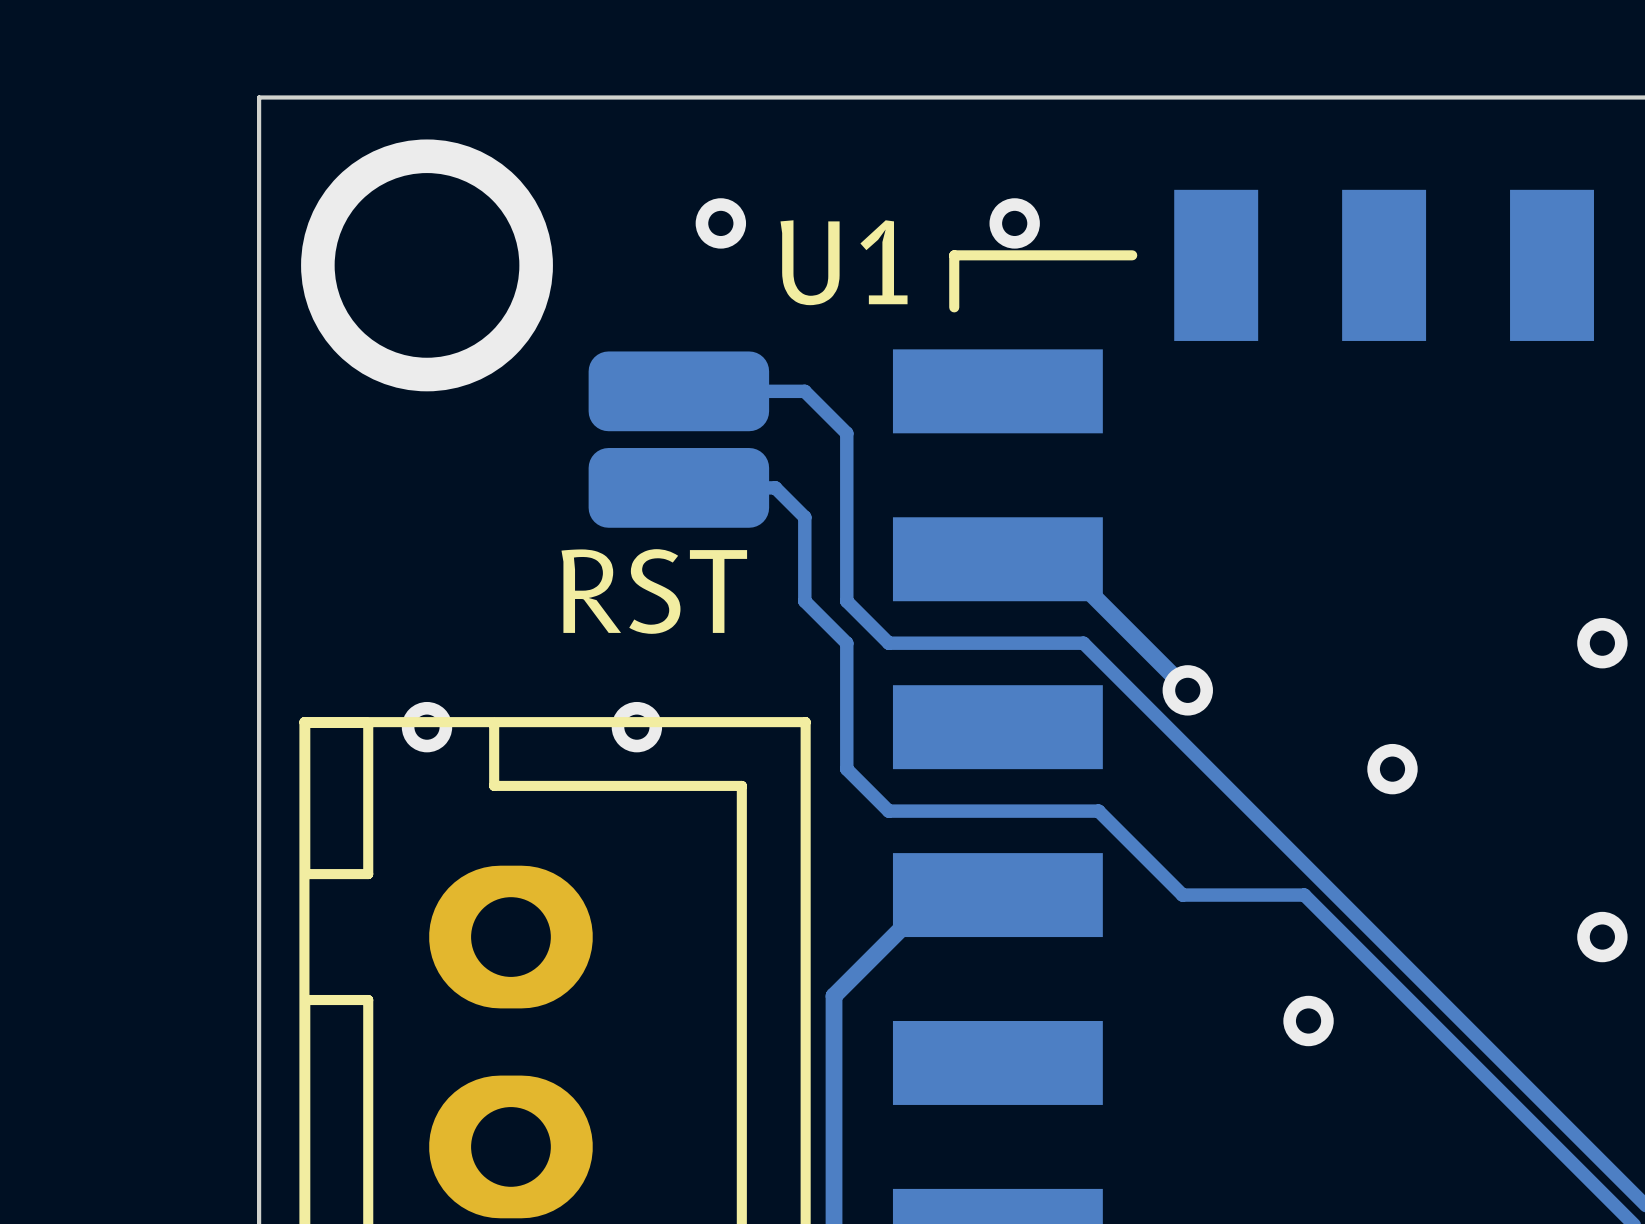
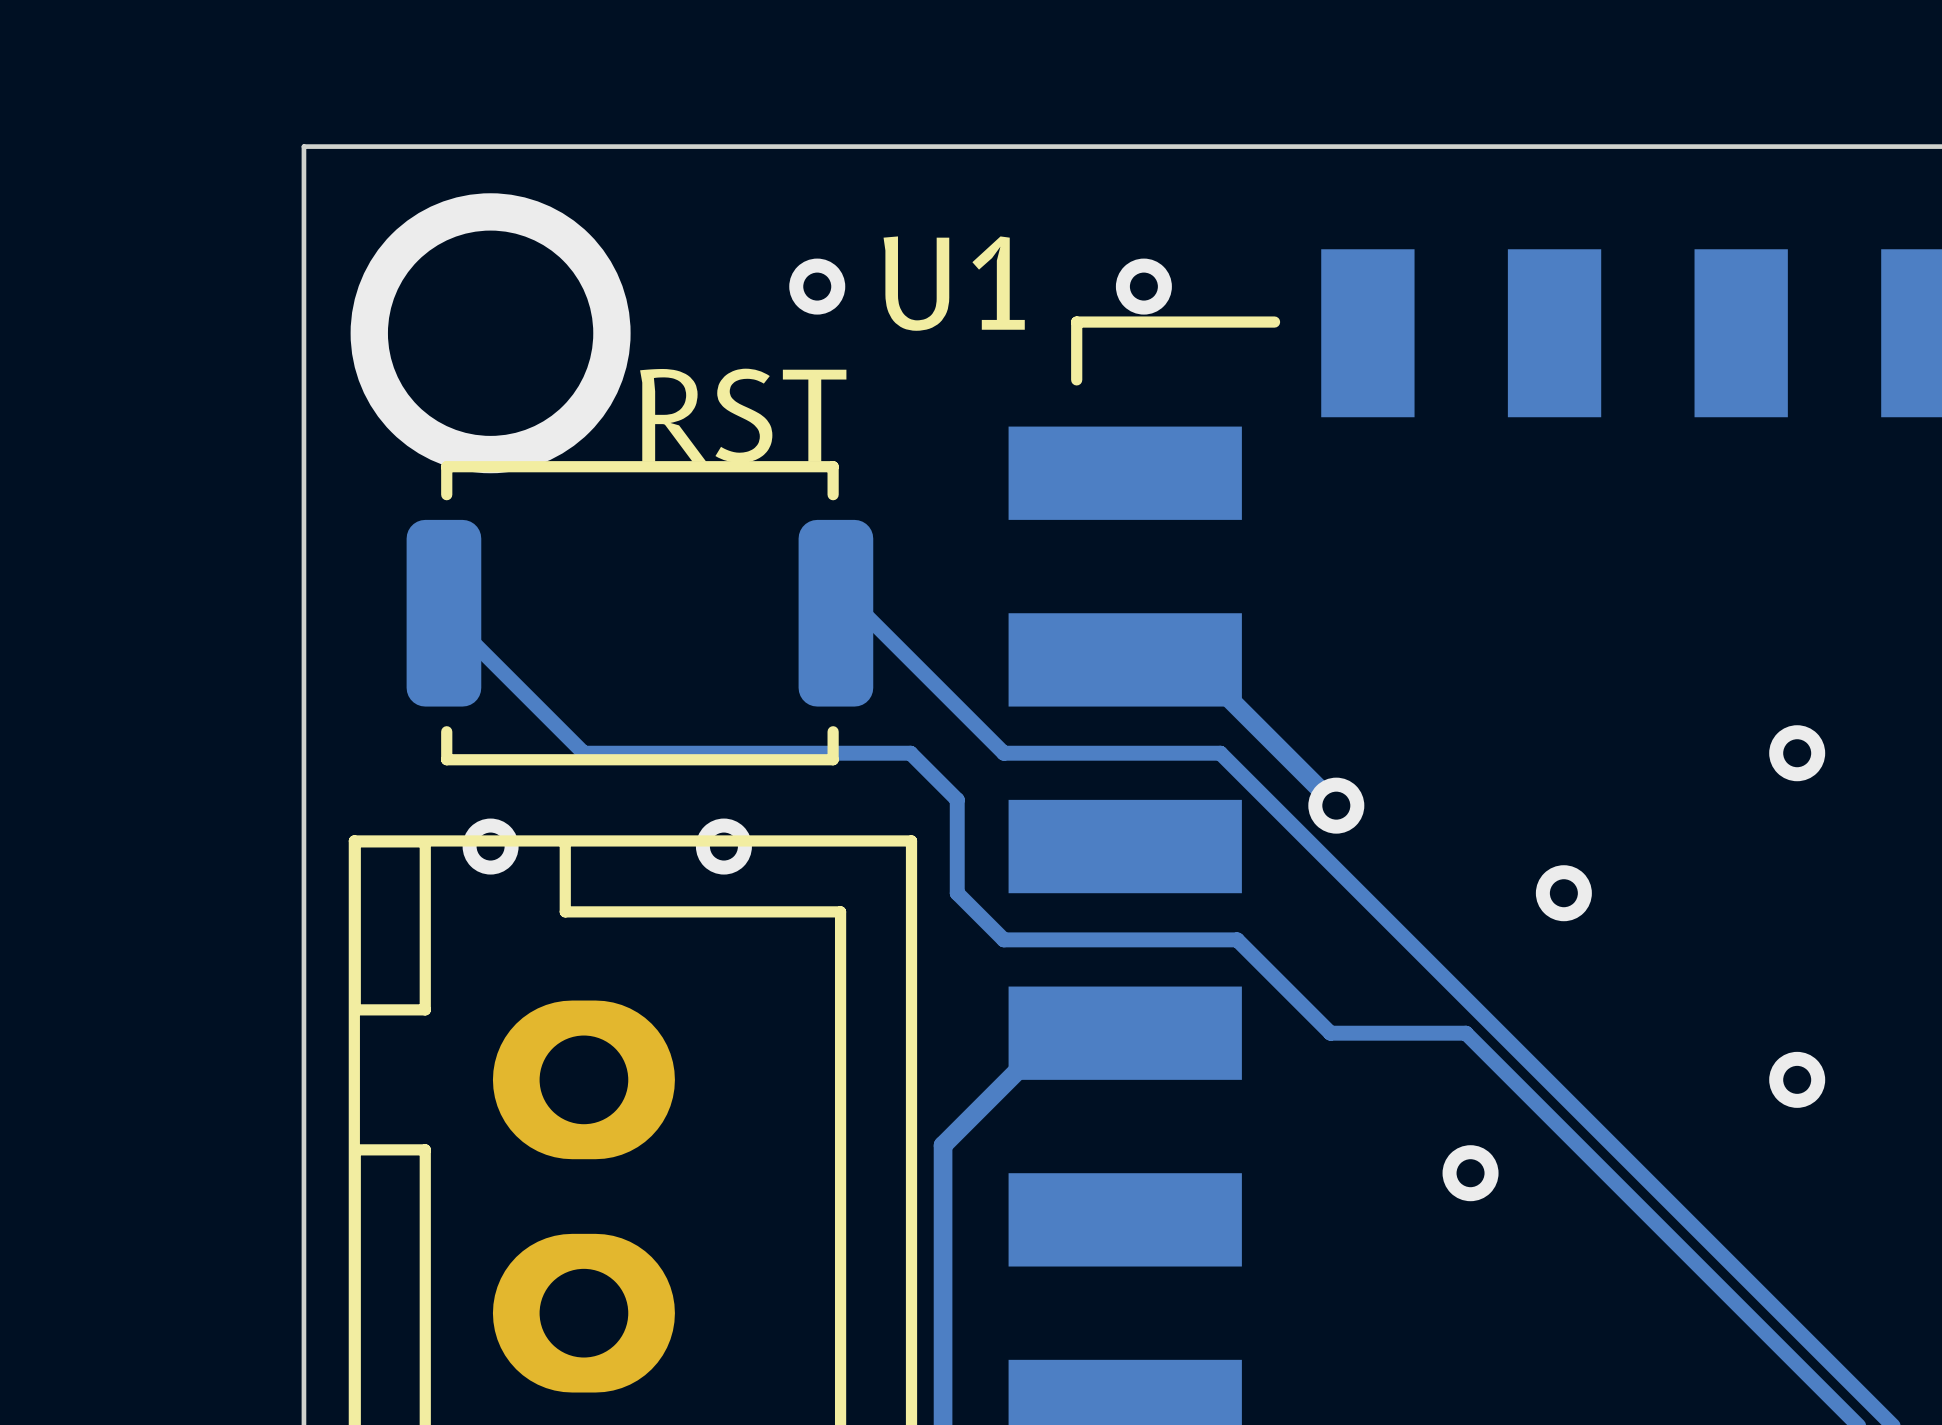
U1 name position: U1 (844, 262) -> U1 (954, 283)
track: (678, 391) (804, 391) (846, 433) (846, 601) -> (835, 613) (863, 613) (957, 706)
part: (678, 439) -> none
track: (678, 487) (775, 487) (804, 517) (804, 601) (846, 643) (846, 685) -> (443, 613) (583, 753) (910, 753) (957, 799)
part: none -> (639, 613)
text position: RST (654, 591) -> RST (743, 415)

